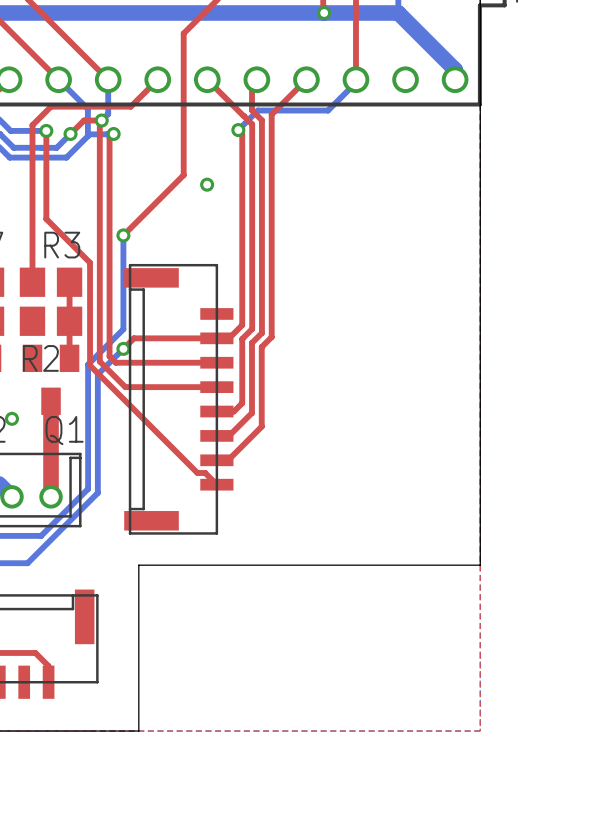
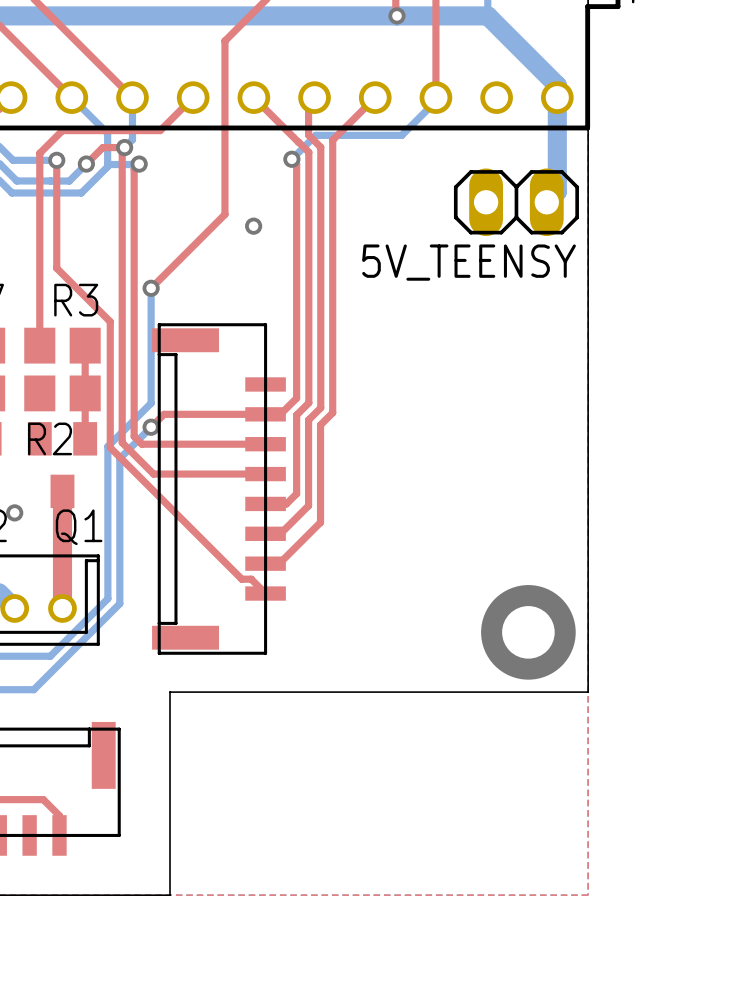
bottom track: none -> (557, 97) (557, 191) (546, 202)
5V_TEENSY: none -> (516, 202)
via: none -> (528, 632)

